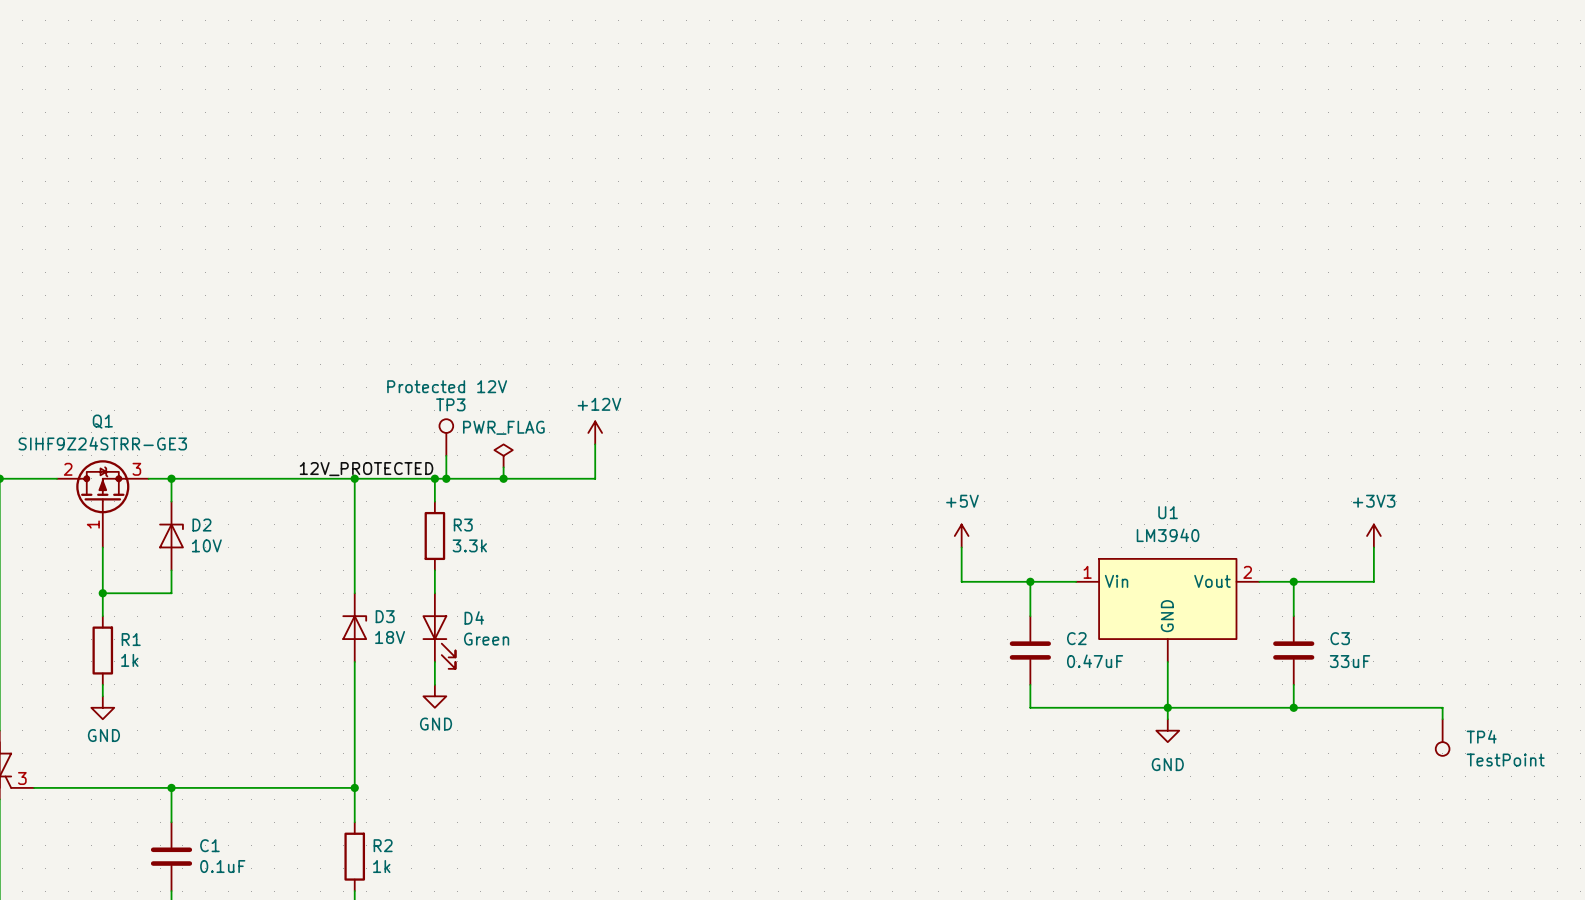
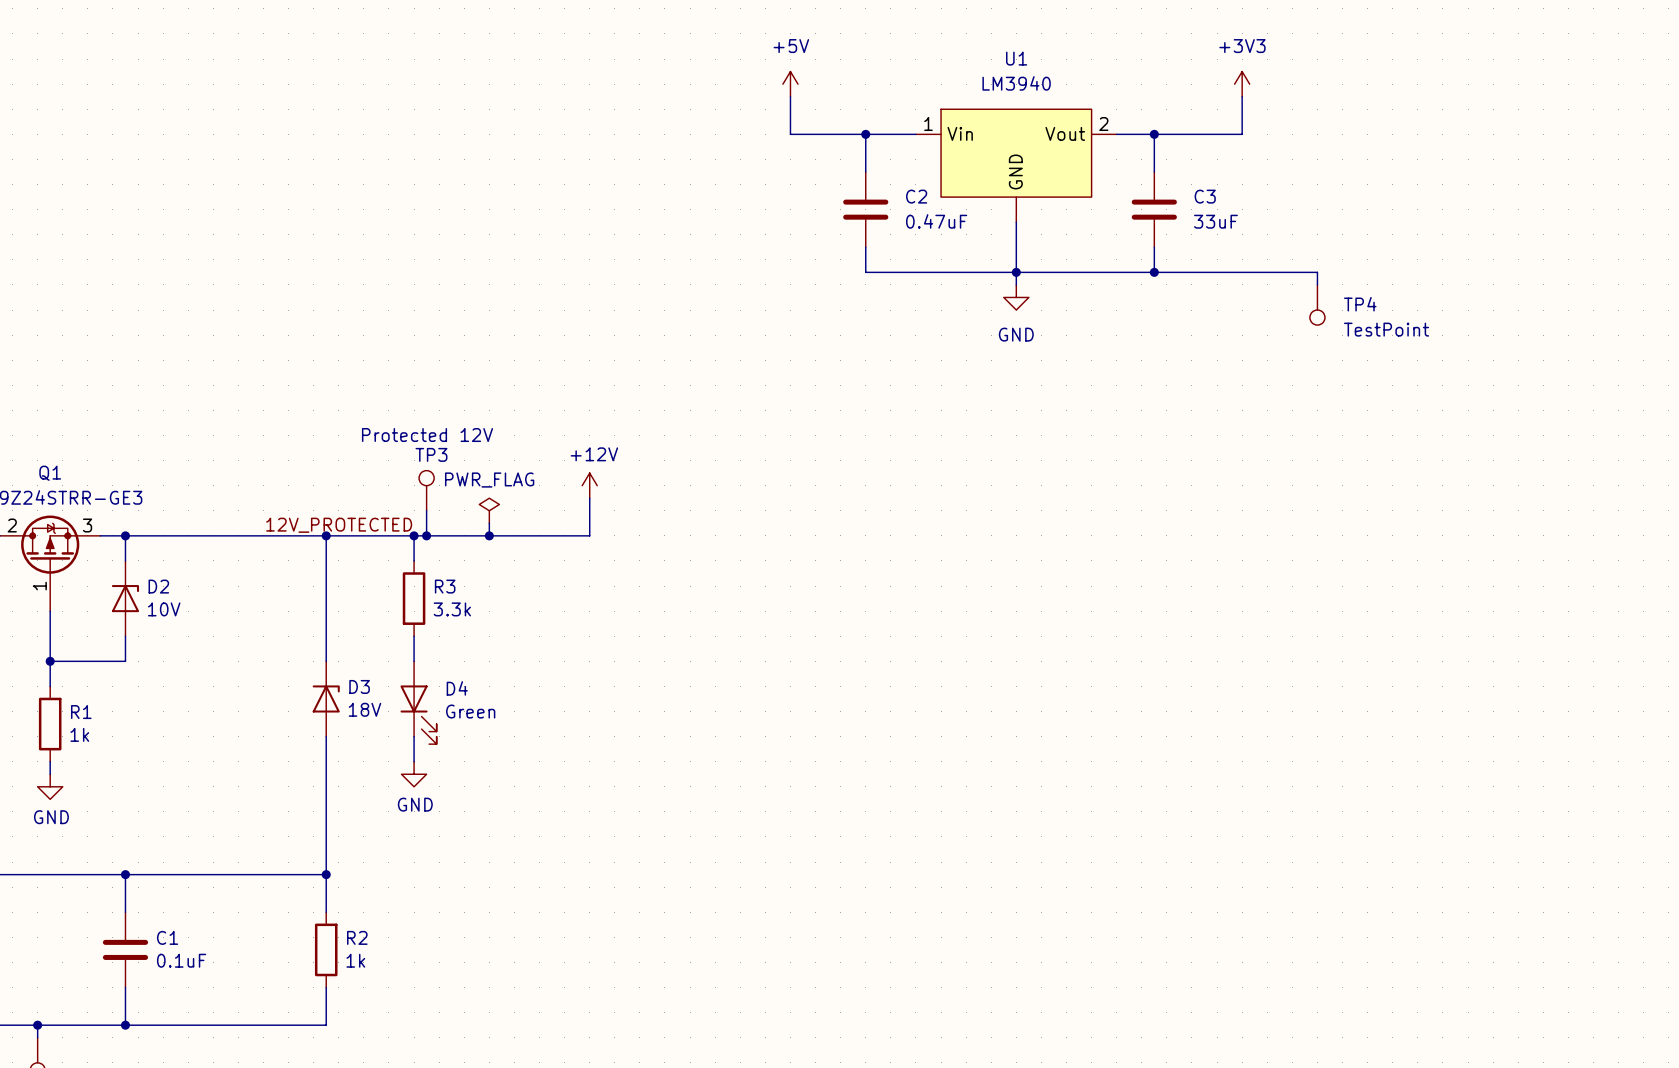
power symbol: none -> +5V (790, 84)
power symbol: none -> +3V3 (1242, 84)
wire: none -> (790, 96) (790, 134) (915, 134)
wire: none -> (1242, 96) (1242, 134) (1116, 134)
wire: none -> (865, 134) (865, 171)
junction: none -> (865, 134)
wire: none -> (1154, 134) (1154, 171)
junction: none -> (1154, 134)
wire: none -> (1016, 222) (1016, 284)
wire: none -> (865, 247) (865, 272) (1317, 272) (1317, 284)
wire: none -> (1154, 247) (1154, 272)
junction: none -> (1016, 272)
junction: none -> (1154, 272)
power symbol: none -> GND (1016, 297)
power symbol: +5V (961, 536) -> none
power symbol: +3V3 (1373, 536) -> none
wire: (961, 547) (961, 581) (1076, 581) -> none
wire: (1373, 547) (1373, 581) (1259, 581) -> none
wire: (1030, 581) (1030, 616) -> none
junction: (1030, 581) -> none
wire: (1293, 581) (1293, 616) -> none
junction: (1293, 581) -> none
U1 position: (1167, 610) -> (1016, 165)
C2 position: (1030, 650) -> (865, 209)
C3 position: (1293, 650) -> (1154, 209)
wire: (1167, 661) (1167, 719) -> none
wire: (1030, 684) (1030, 707) (1442, 707) (1442, 719) -> none
wire: (1293, 684) (1293, 707) -> none
junction: (1167, 707) -> none
junction: (1293, 707) -> none
power symbol: GND (1167, 730) -> none
TP4 position: (1442, 737) -> (1317, 304)

